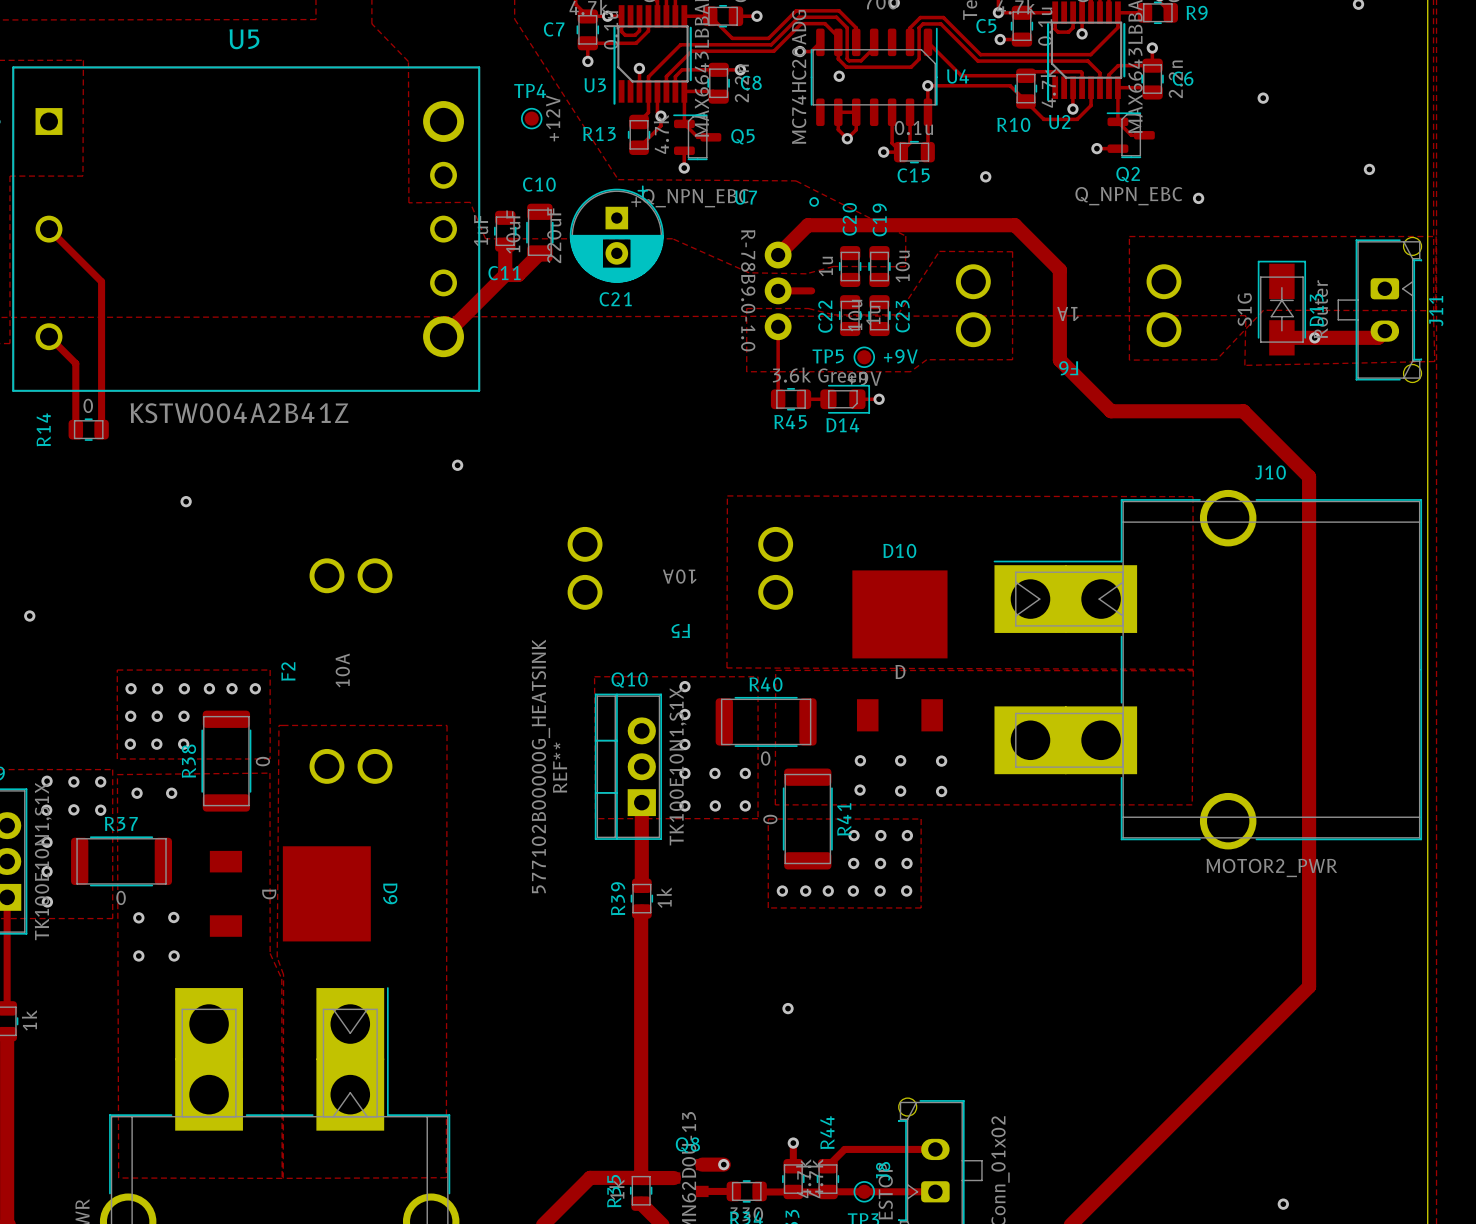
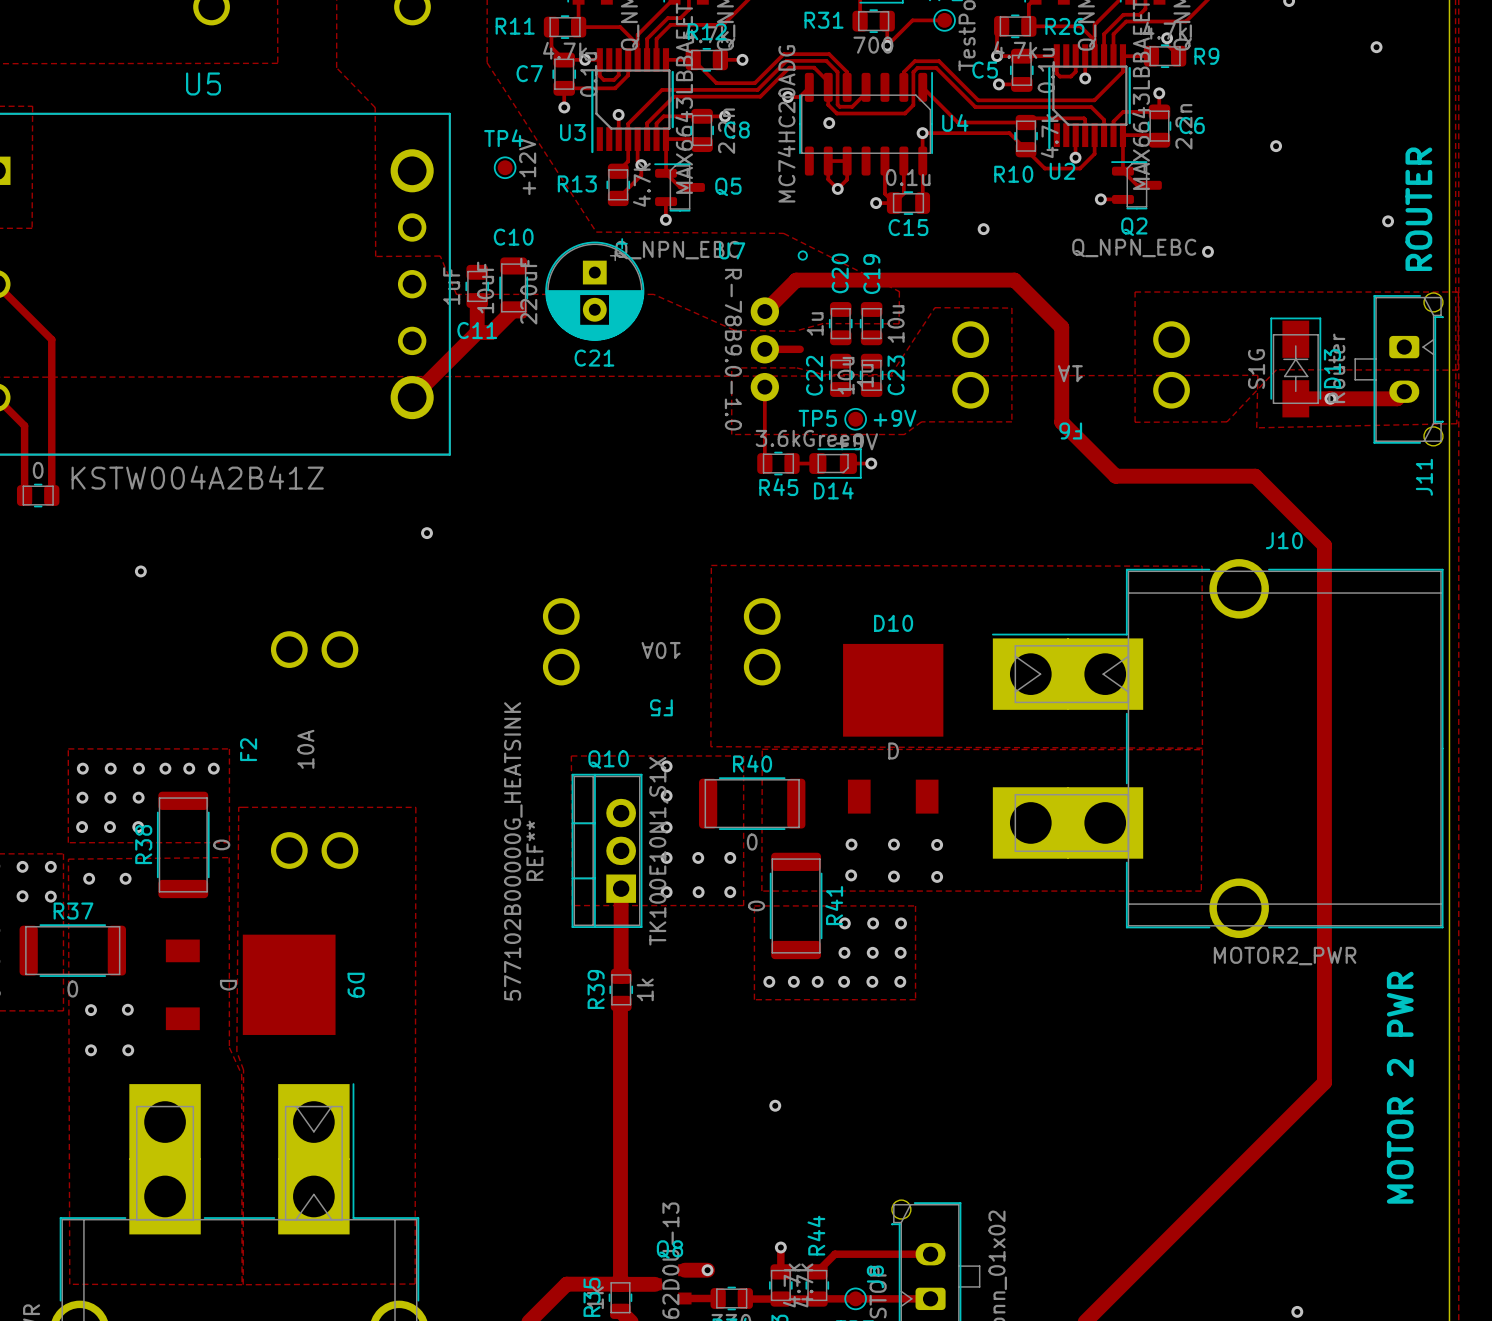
text: none -> ROUTER (1418, 209)
J11 name position: J11 (1436, 311) -> J11 (1424, 477)
text: none -> MOTOR 2 PWR (1400, 1087)

